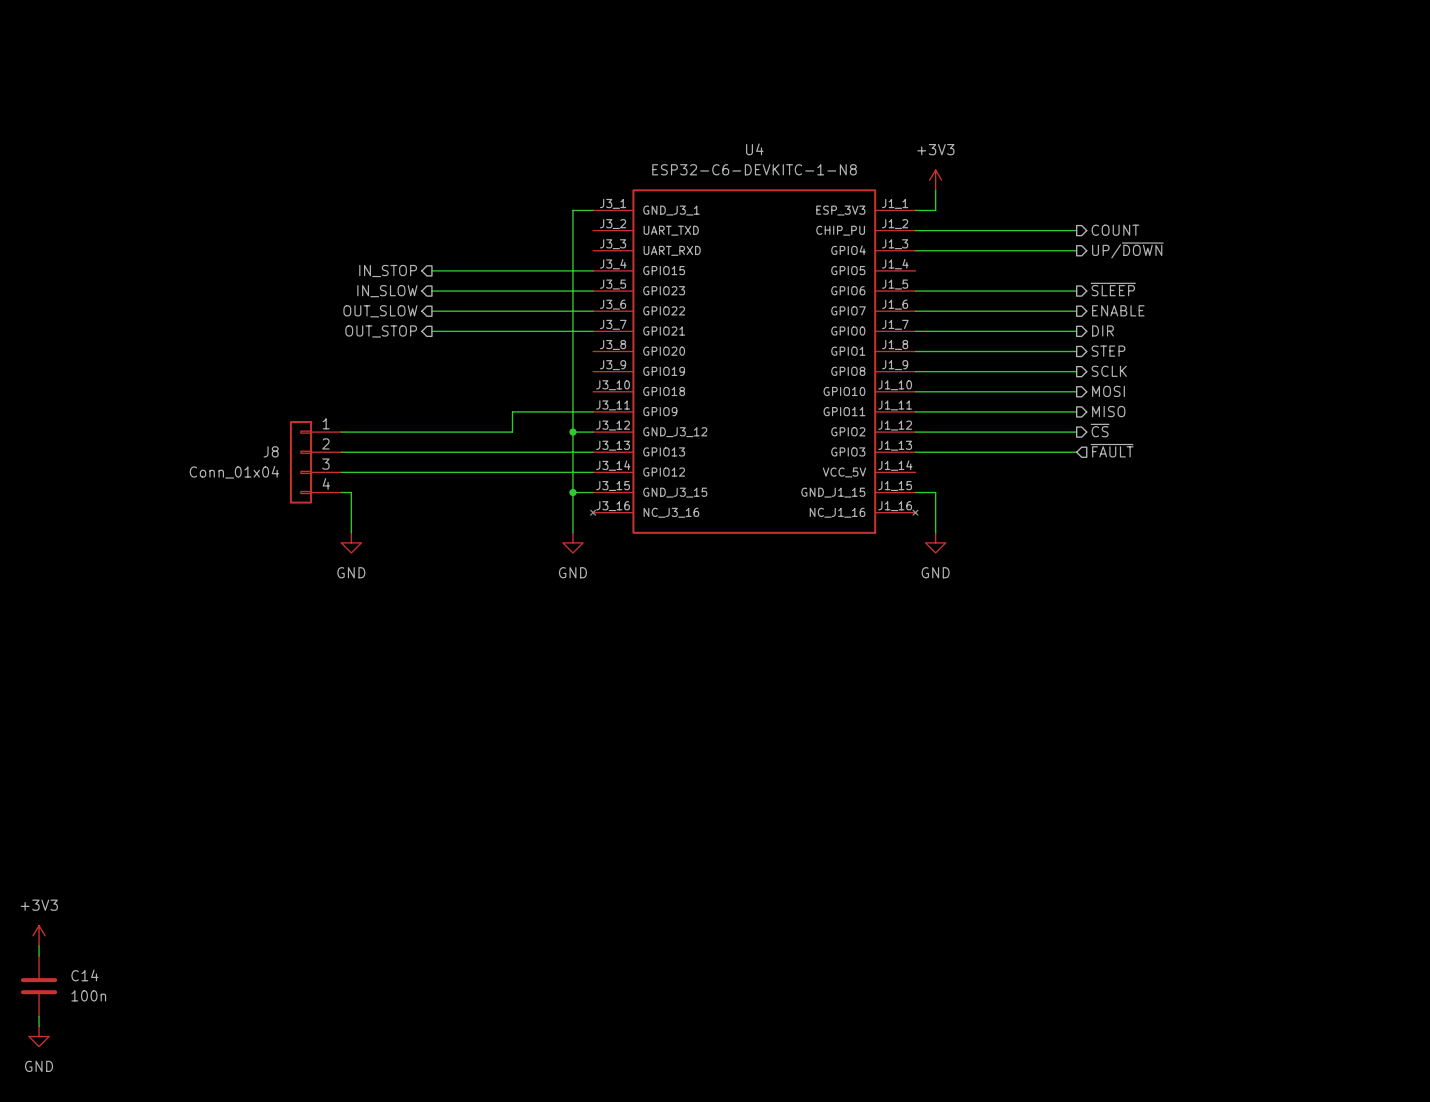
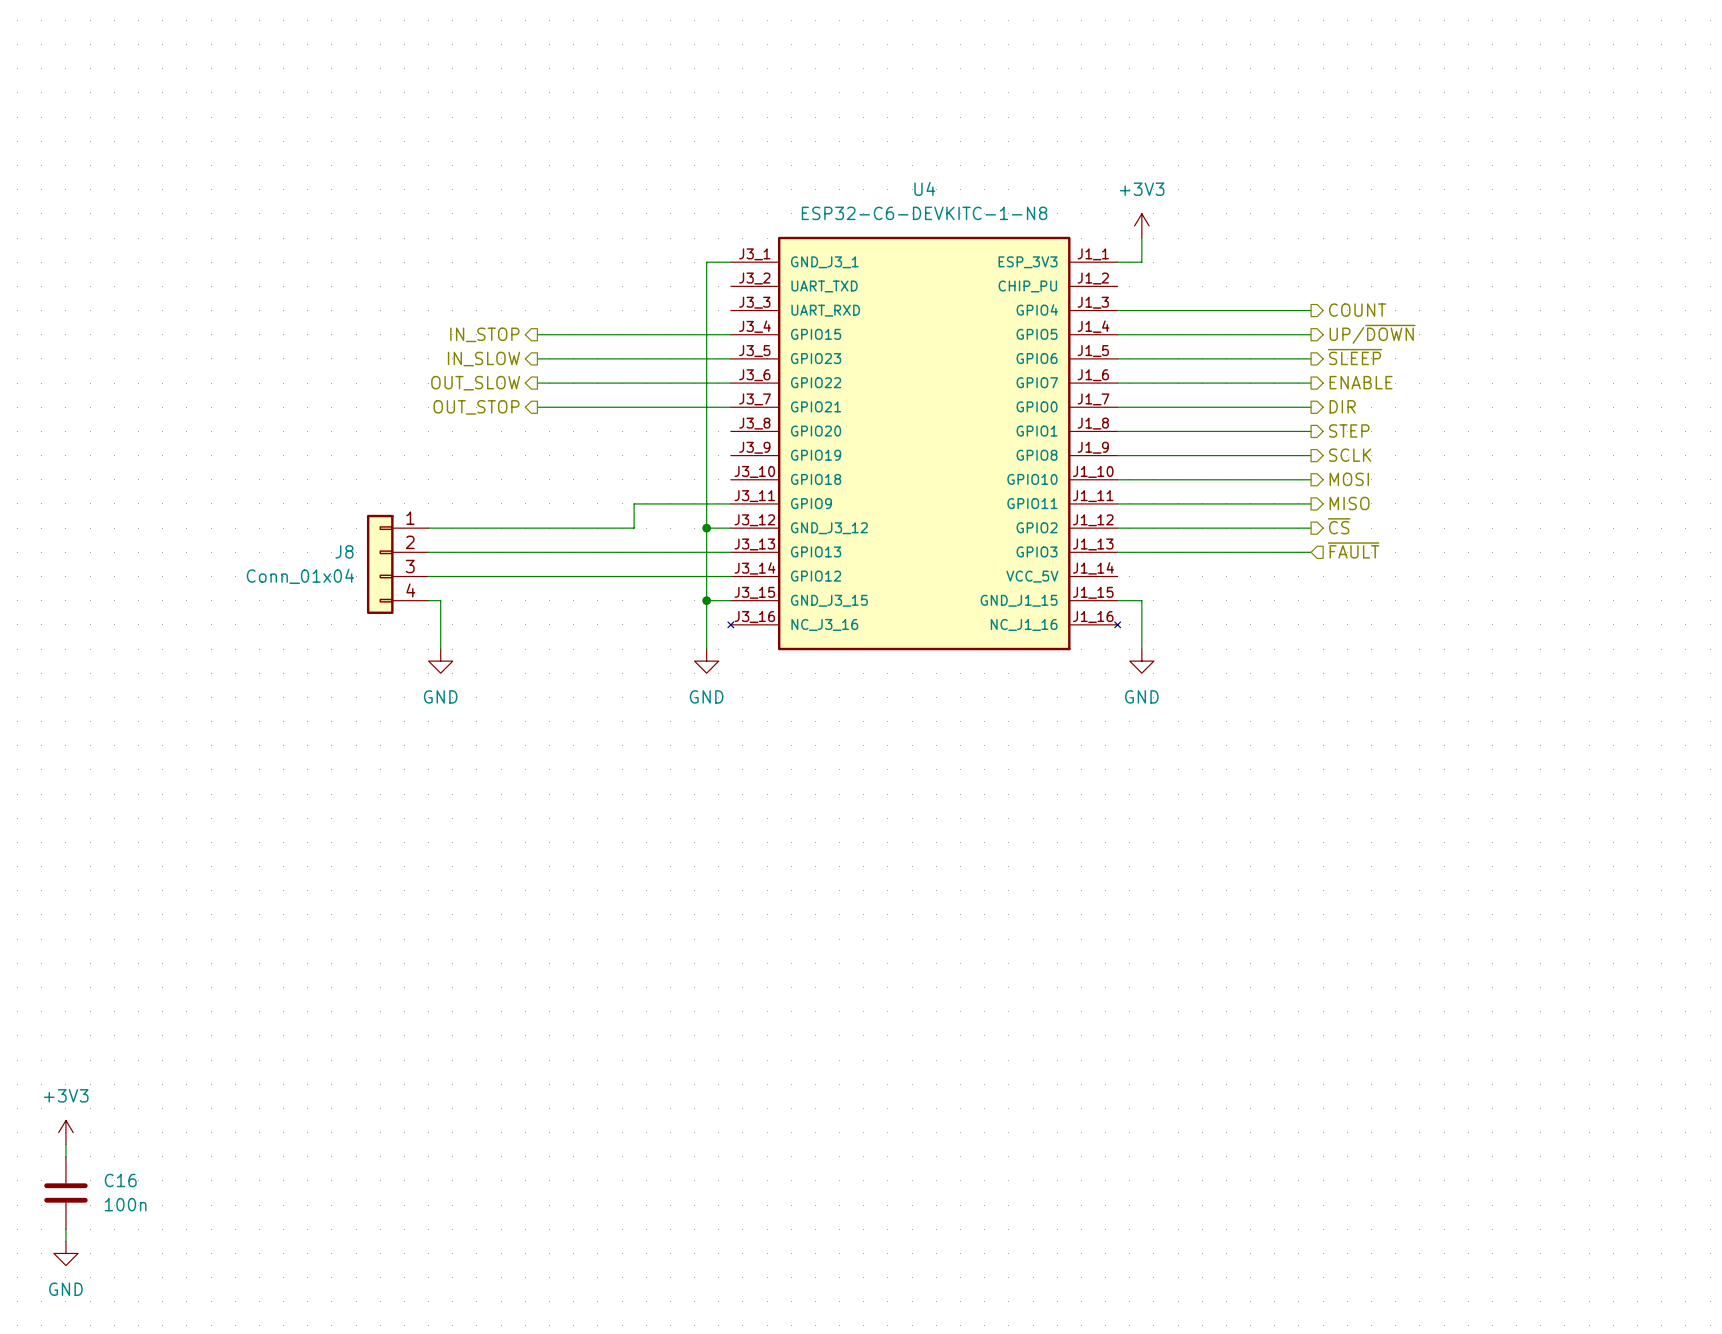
wire: (915, 230) (1076, 230) -> (1117, 334) (1311, 334)
hierarchical label: COUNT (1115, 230) -> none
hierarchical label: UP/~{DOWN} (1127, 250) -> COUNT (1357, 310)
hierarchical label: none -> UP/~{DOWN} (1372, 334)
C14 name: C14 (84, 975) -> C16 (120, 1180)

